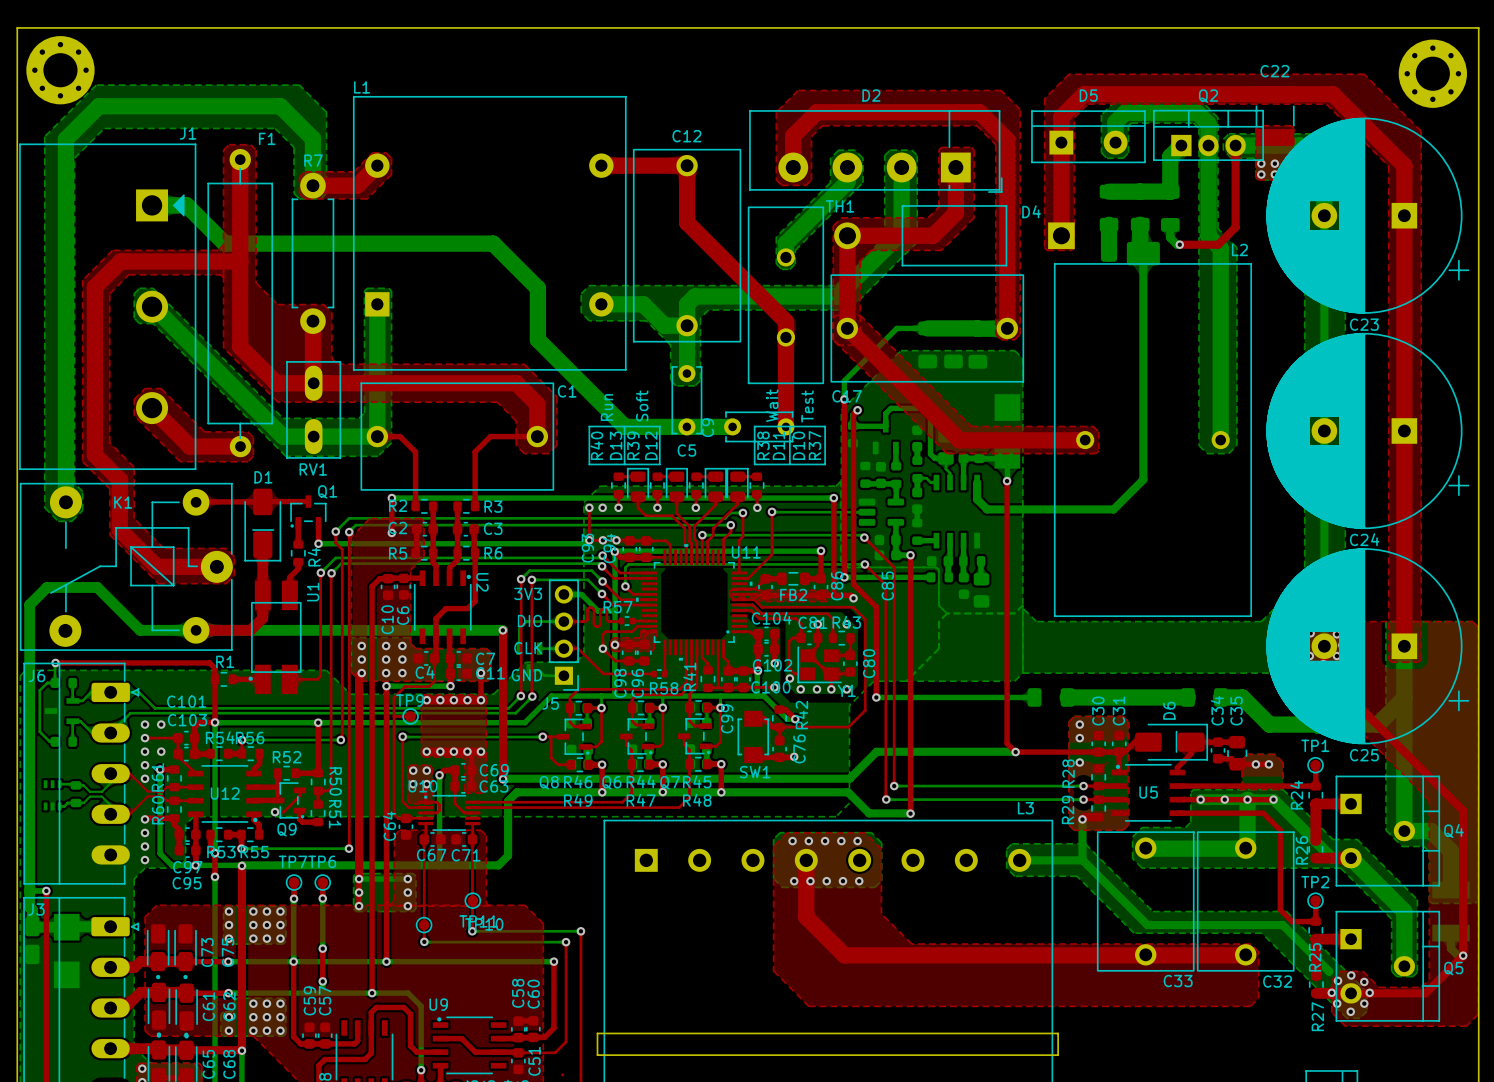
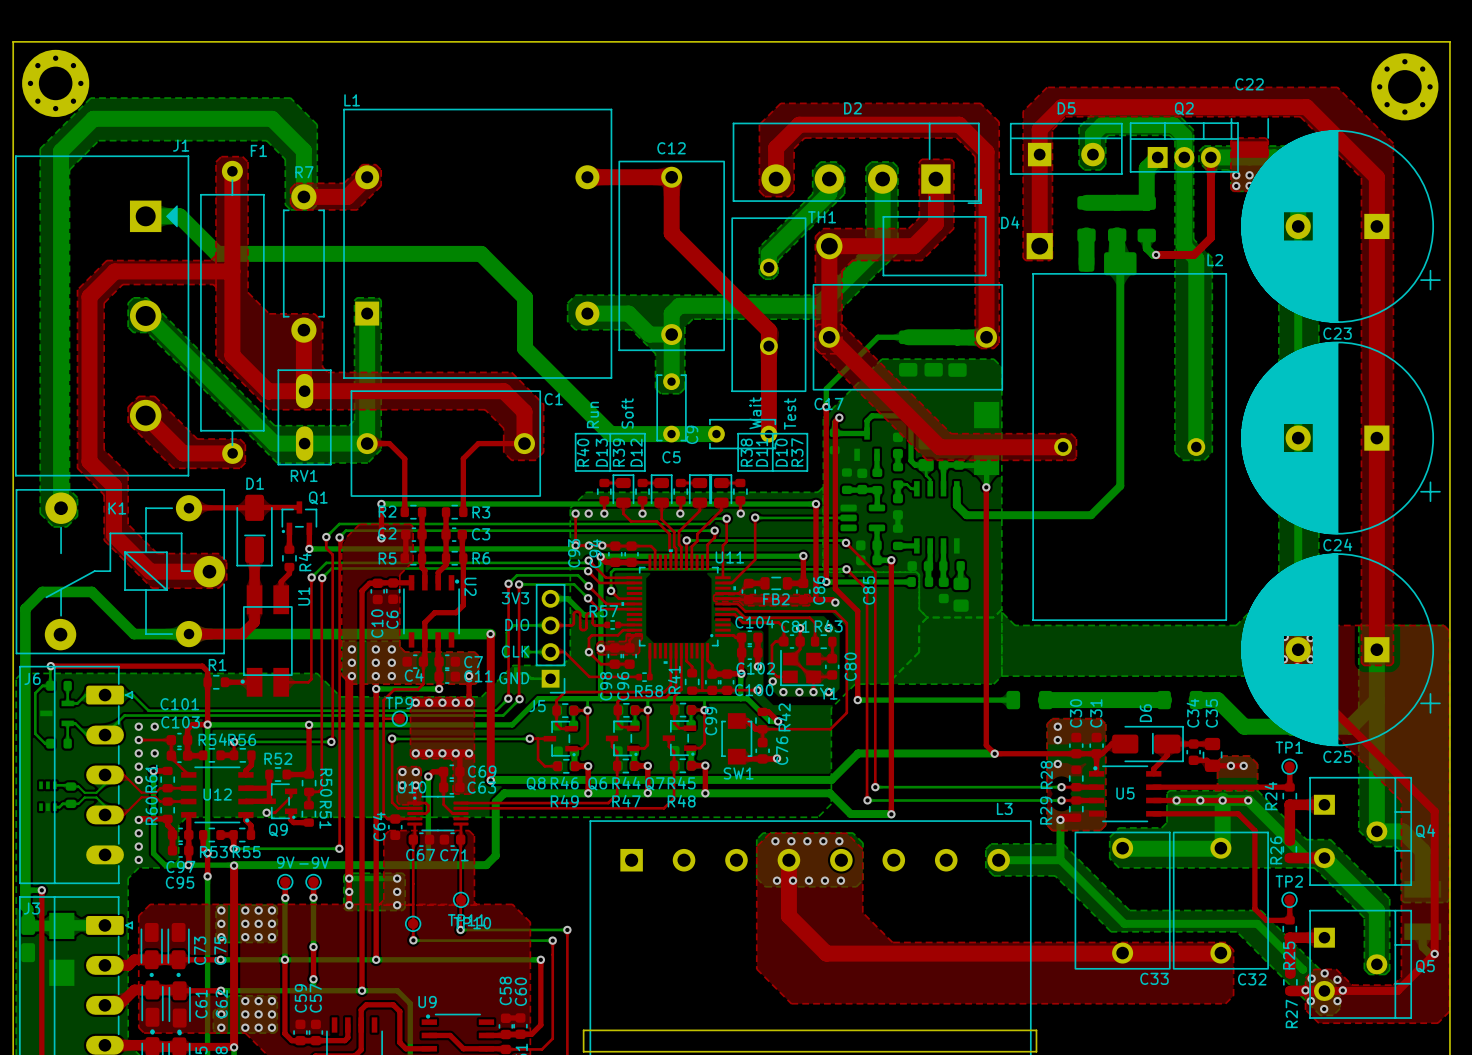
TP7 name: TP7 (292, 861) -> none
TP6 name: TP6 (322, 861) -> none
TP7 value: none -> 9V (285, 862)
TP6 value: none -> -9V (314, 862)

